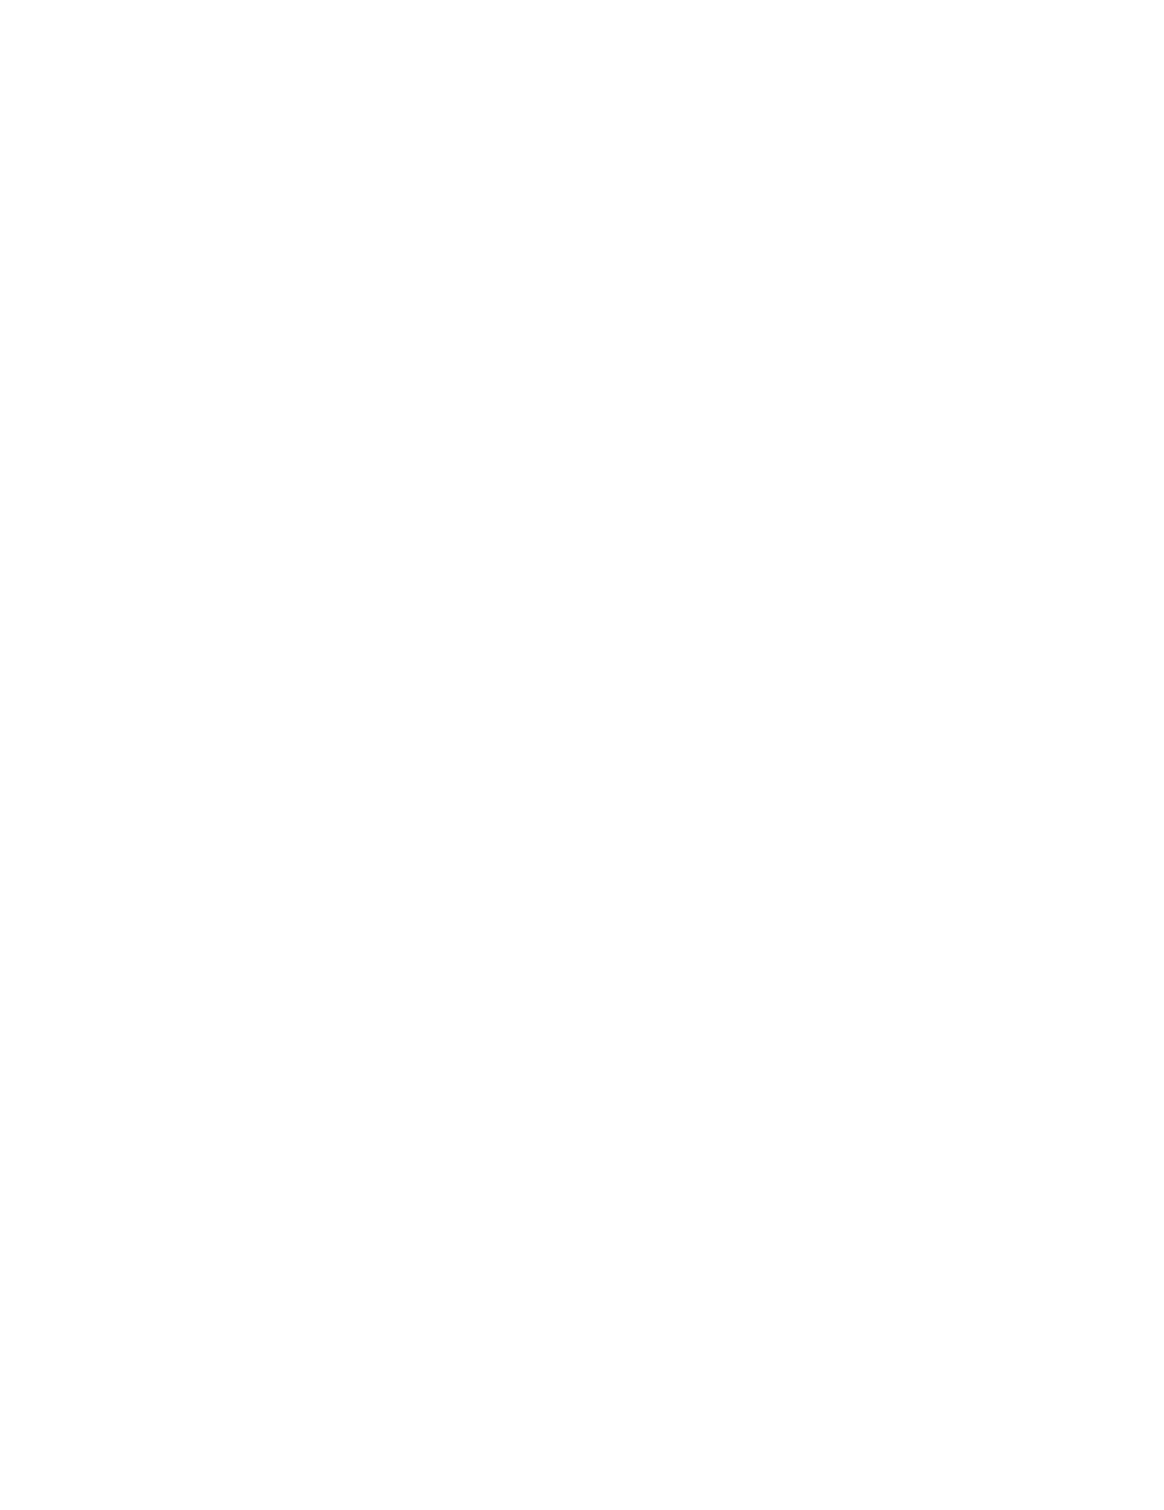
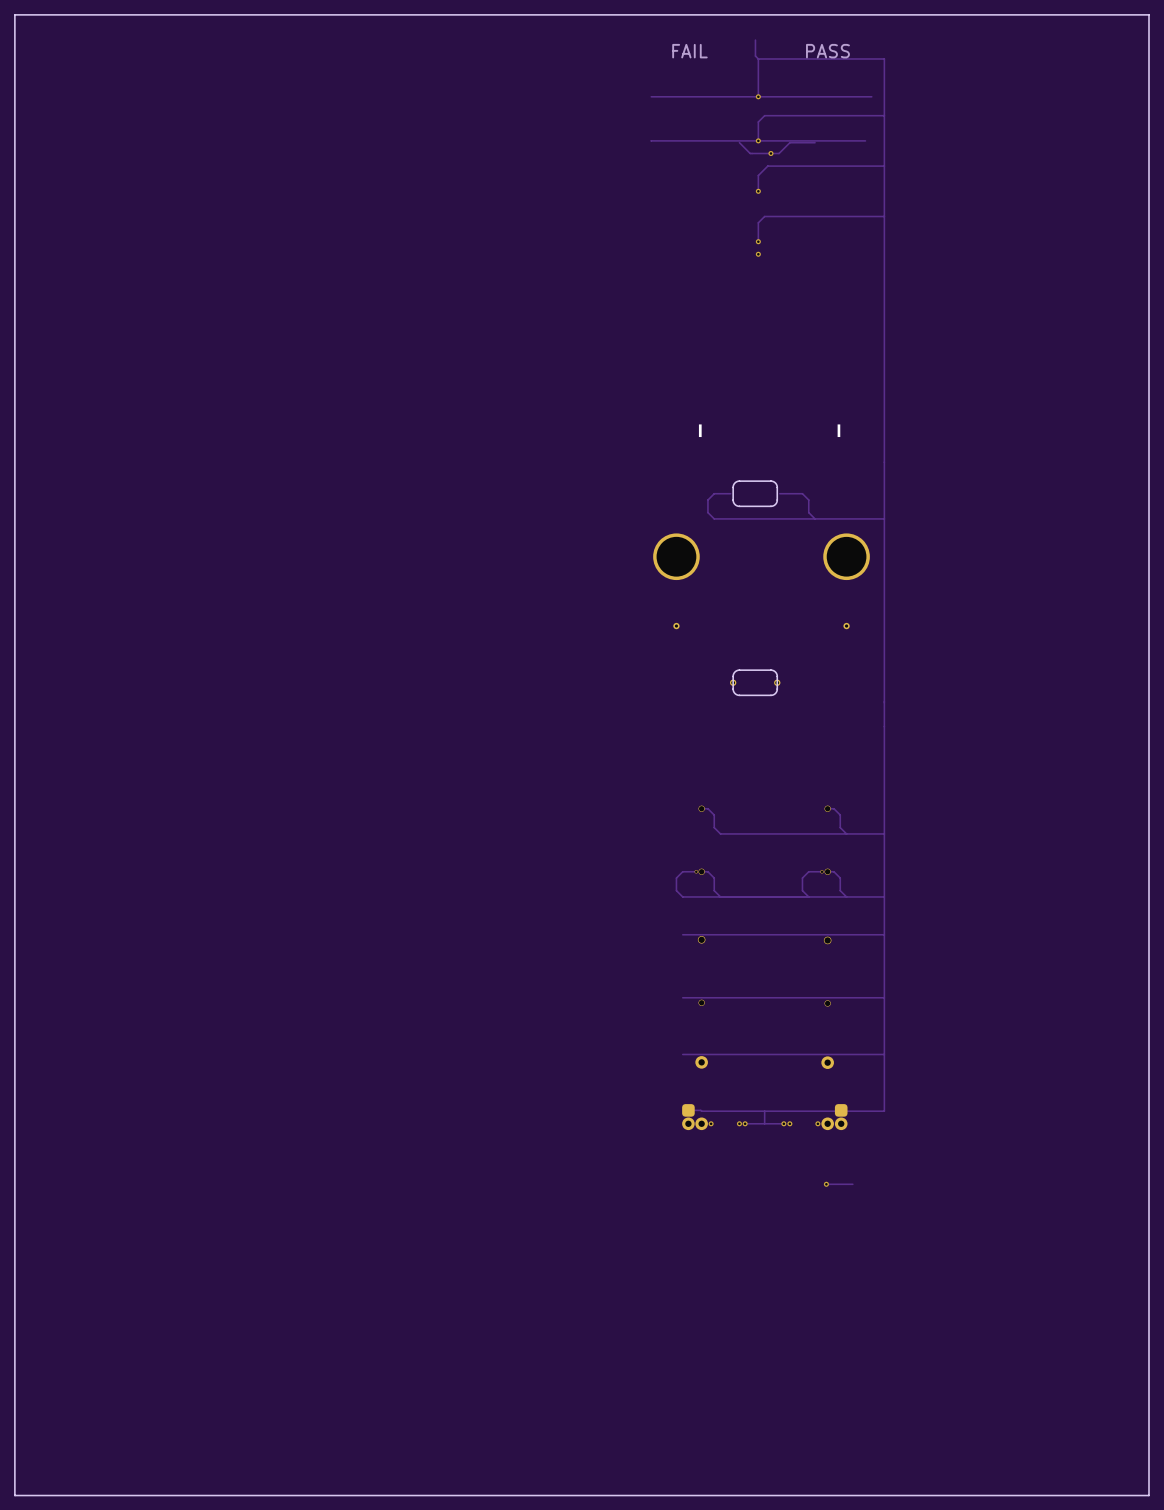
board edge: none -> (14, 14) (1148, 14) (1148, 1495) (14, 1495) (14, 14)
track: none -> (755, 40) (755, 56) (758, 58)
text: none -> FAIL (689, 51)
text: none -> PASS (827, 51)
track: none -> (758, 58) (884, 58) (884, 1111) (688, 1110)
track: none -> (758, 58) (758, 96)
track: none -> (651, 96) (758, 96)
track: none -> (758, 96) (871, 96)
via: none -> (758, 96)
track: none -> (884, 115) (764, 115) (758, 122) (758, 140)
track: none -> (651, 140) (865, 140)
via: none -> (758, 140)
track: none -> (739, 142) (750, 153)
track: none -> (815, 142) (789, 142) (779, 153) (750, 153)
via: none -> (770, 153)
track: none -> (884, 166) (767, 166) (758, 175) (758, 191)
via: none -> (758, 191)
track: none -> (884, 216) (764, 216) (758, 222) (758, 241)
via: none -> (758, 241)
via: none -> (758, 254)
drawing: none -> [698, 424, 702, 438]
drawing: none -> [837, 424, 841, 438]
board edge: none -> (739, 481) (774, 482) (777, 486) (776, 503) (770, 506) (736, 505) (733, 500) (733, 486) (735, 482) (739, 481)
track: none -> (730, 493) (714, 493) (707, 500) (707, 512) (714, 518) (884, 518)
track: none -> (779, 493) (802, 493) (808, 500) (808, 512) (815, 518)
part: none -> (676, 556)
part: none -> (846, 556)
part: none -> (676, 626)
part: none -> (846, 626)
board edge: none -> (739, 670) (774, 671) (777, 675) (776, 692) (770, 695) (736, 694) (733, 689) (733, 675) (735, 671) (739, 670)
part: none -> (733, 682)
part: none -> (777, 682)
track: none -> (701, 808) (707, 808) (714, 815) (714, 827) (720, 833) (884, 833)
part: none -> (701, 808)
track: none -> (827, 808) (833, 808) (840, 815) (840, 827) (846, 833)
part: none -> (827, 808)
track: none -> (695, 871) (682, 871) (676, 878) (676, 890) (682, 896) (884, 896)
via: none -> (696, 871)
track: none -> (701, 871) (707, 871) (714, 878) (714, 890) (720, 896)
part: none -> (701, 871)
track: none -> (821, 871) (808, 871) (802, 878) (802, 890) (808, 896)
via: none -> (821, 871)
track: none -> (827, 871) (833, 871) (840, 878) (840, 890) (846, 896)
part: none -> (827, 871)
track: none -> (682, 934) (884, 934)
part: none -> (701, 939)
part: none -> (827, 940)
track: none -> (682, 997) (884, 997)
part: none -> (701, 1002)
part: none -> (827, 1003)
track: none -> (682, 1054) (884, 1054)
part: none -> (701, 1062)
part: none -> (827, 1062)
part: none -> (688, 1110)
part: none -> (841, 1110)
track: none -> (764, 1111) (764, 1123)
part: none -> (688, 1123)
part: none -> (701, 1123)
via: none -> (711, 1123)
via: none -> (739, 1123)
track: none -> (745, 1123) (783, 1123)
via: none -> (745, 1123)
via: none -> (783, 1123)
via: none -> (789, 1123)
via: none -> (817, 1123)
part: none -> (827, 1123)
part: none -> (841, 1123)
track: none -> (826, 1184) (852, 1184)
via: none -> (826, 1184)

